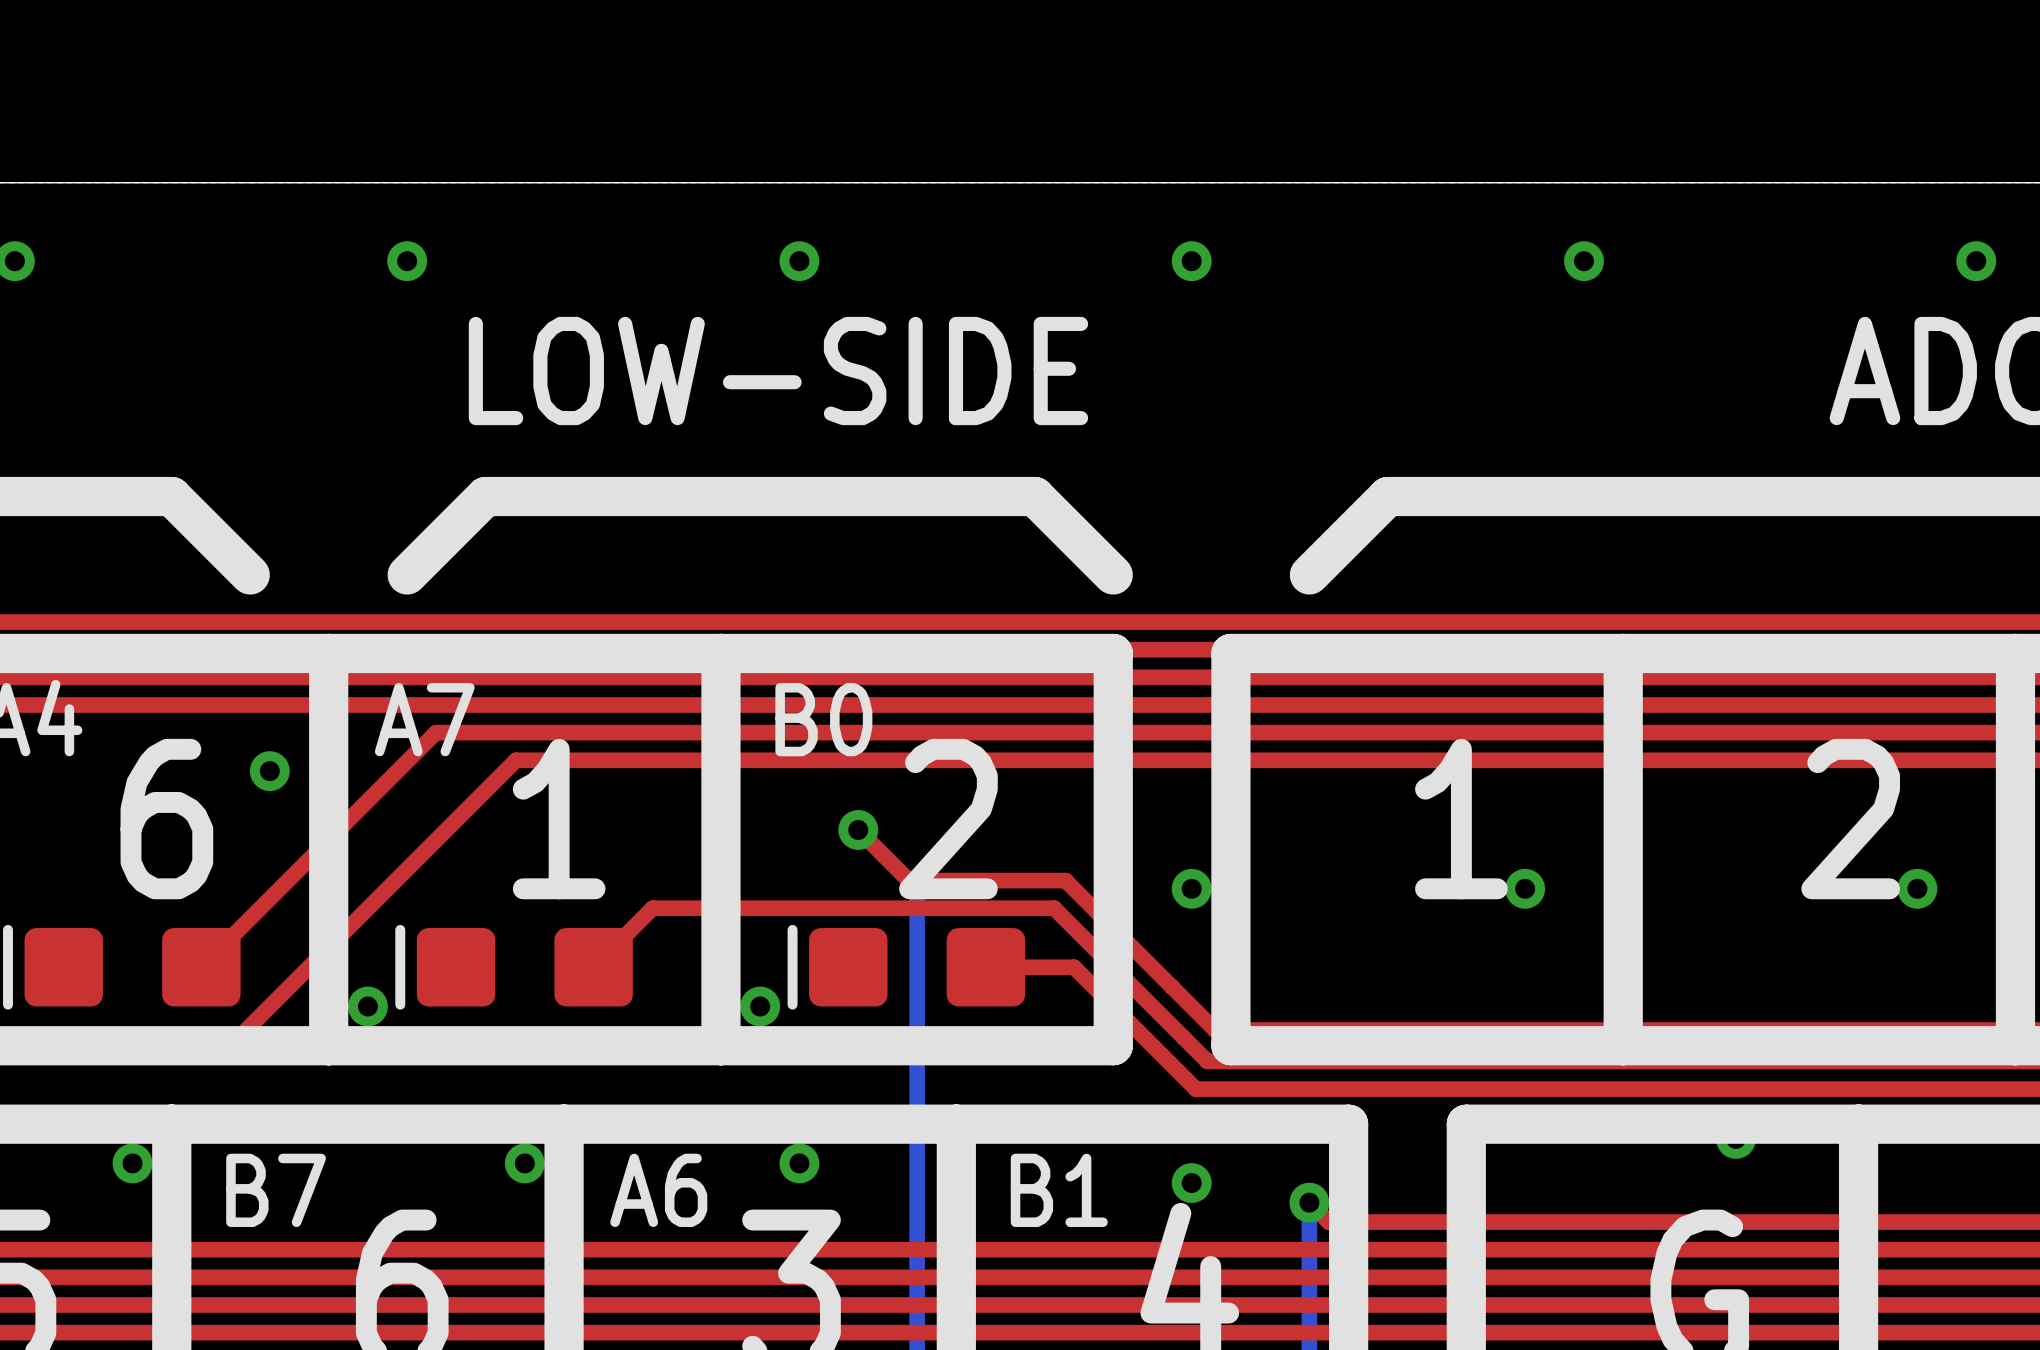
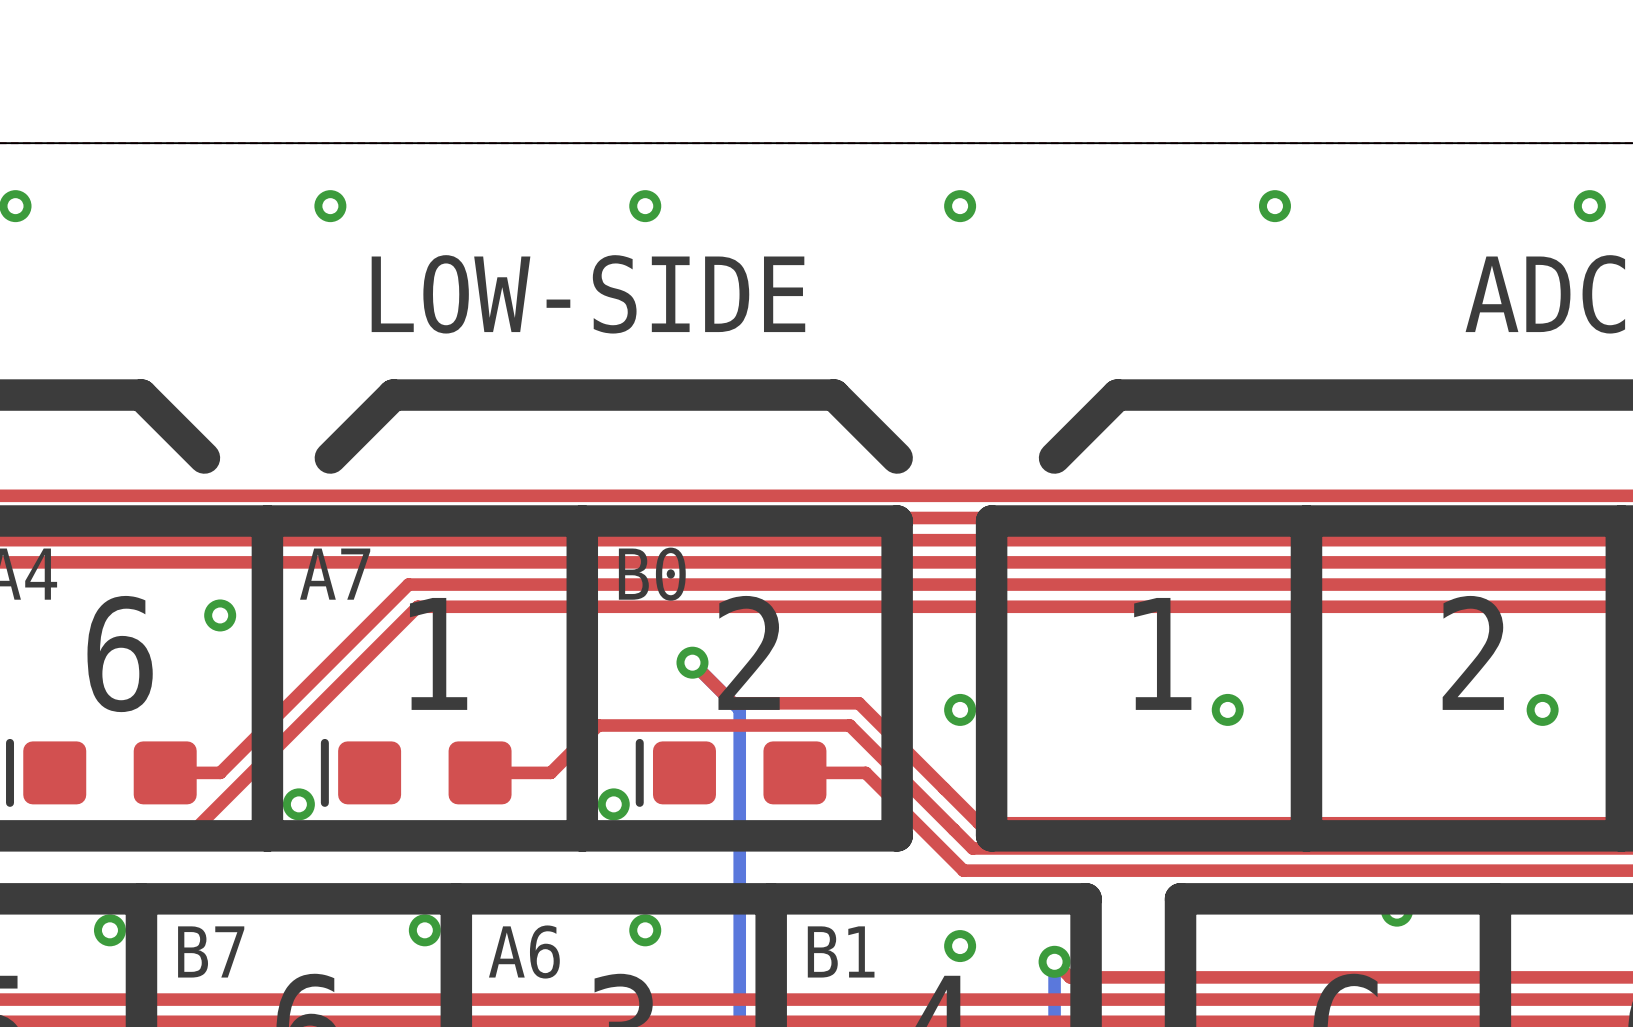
top track: (504, 732) (435, 732) (201, 967) -> (408, 584) (220, 772) (165, 772)
top track: (740, 908) (652, 908) (593, 967) -> (598, 725) (550, 772) (480, 772)

